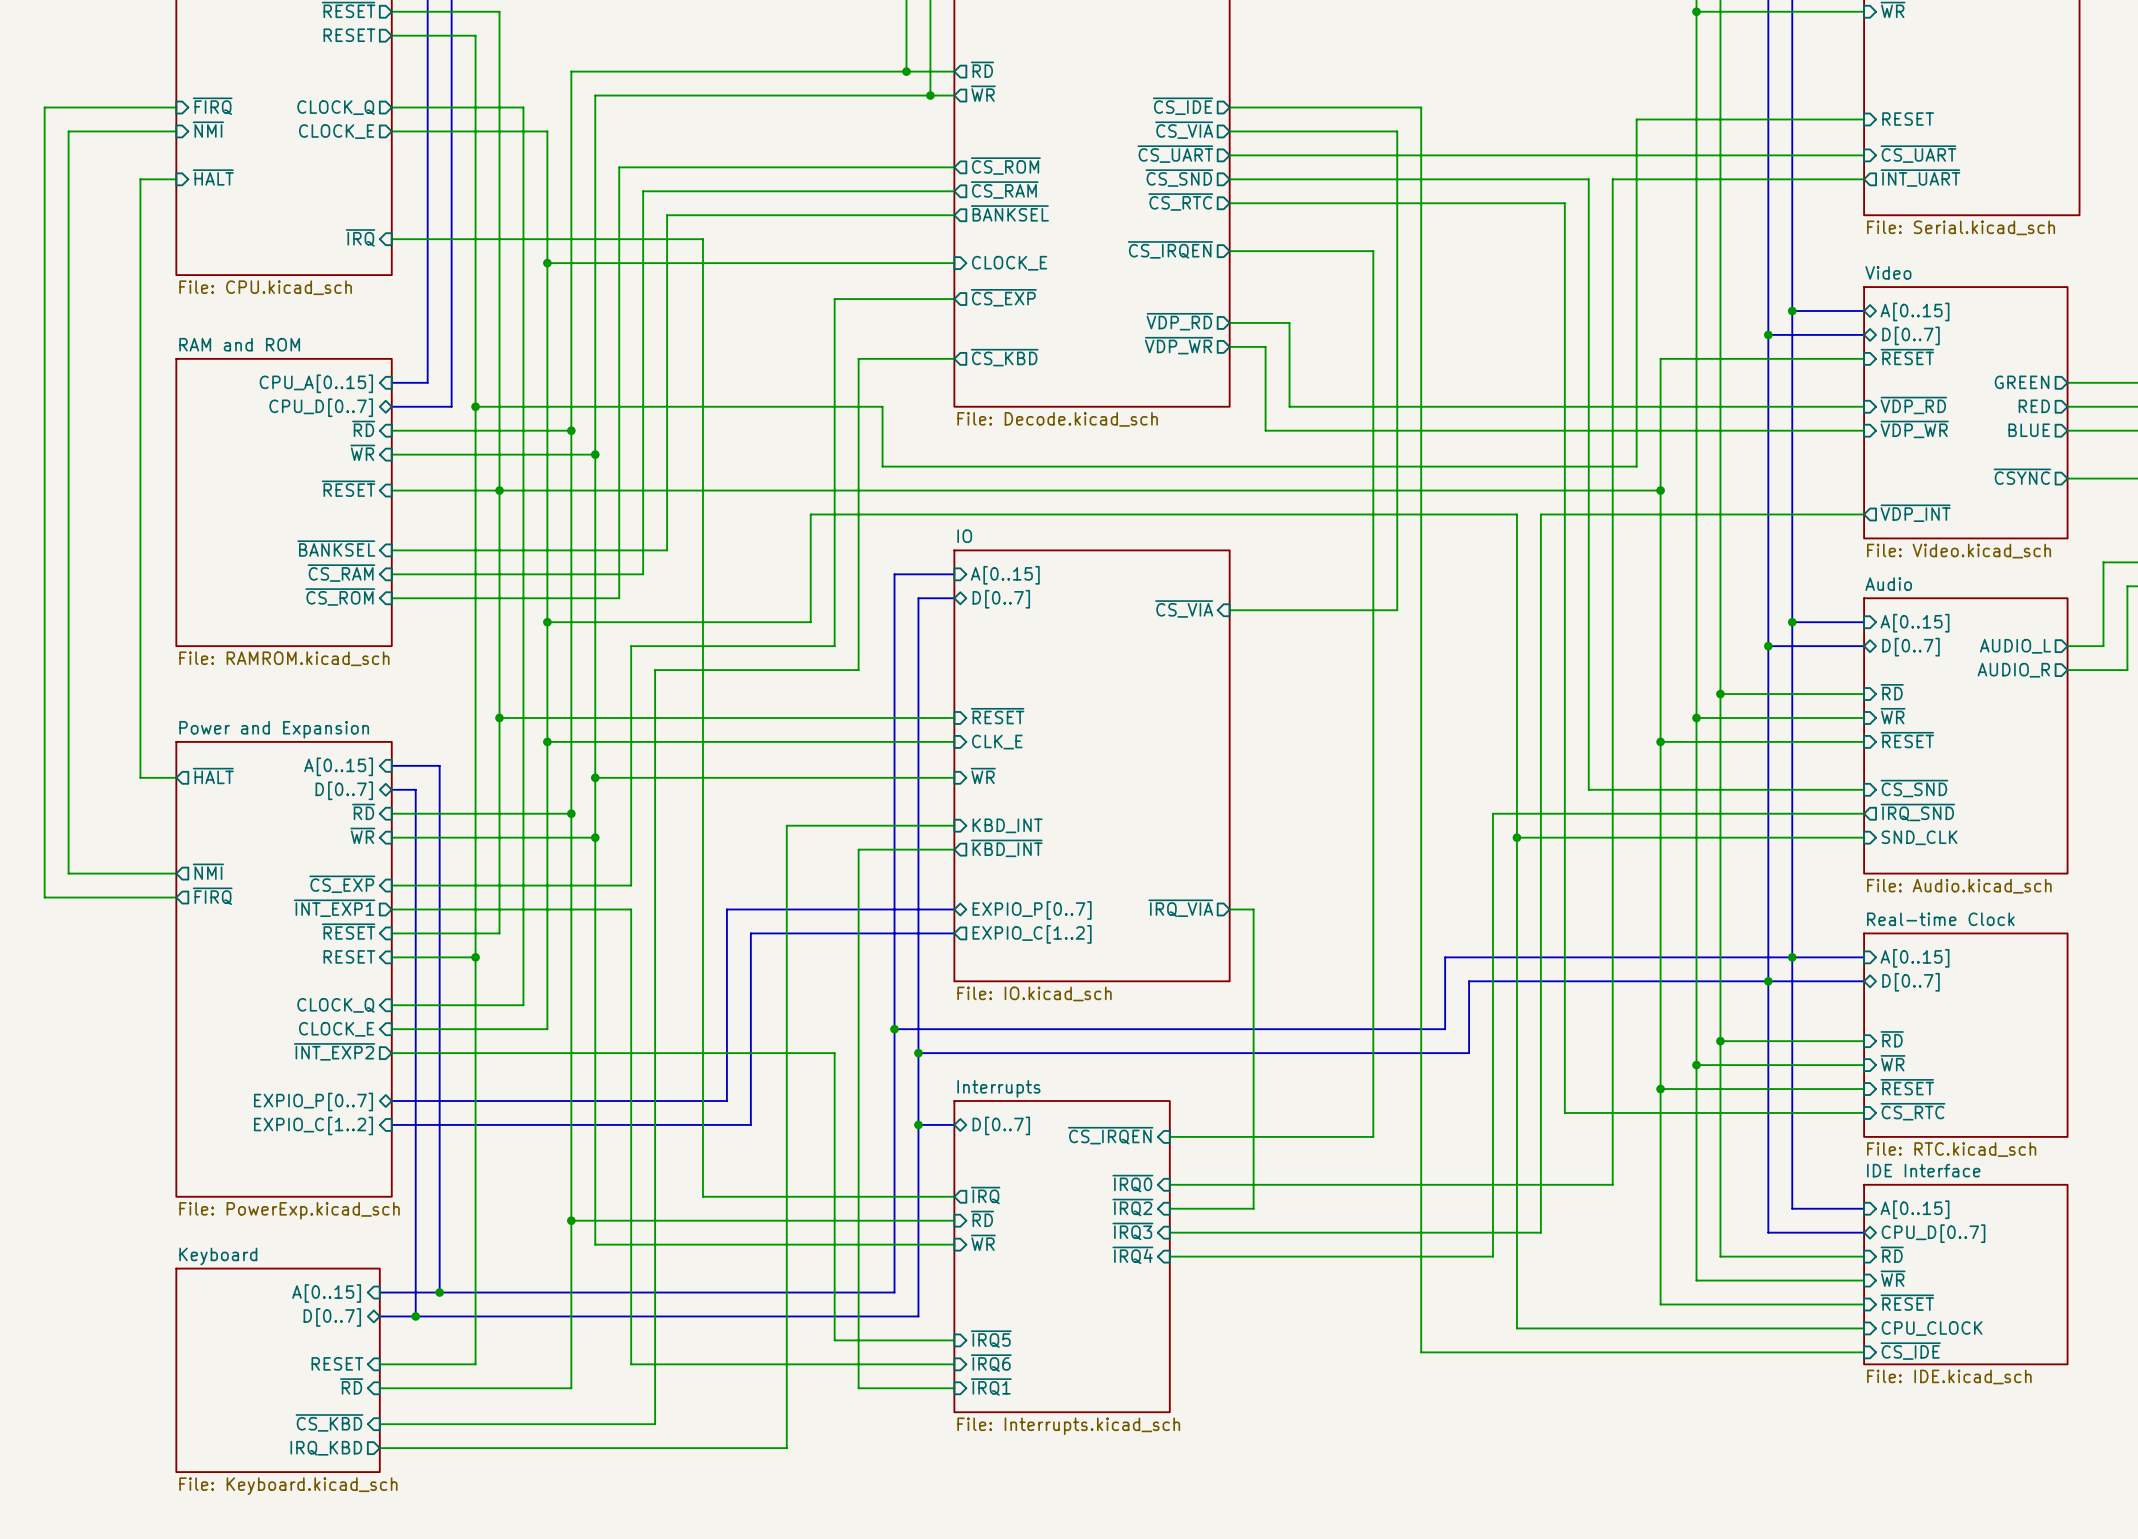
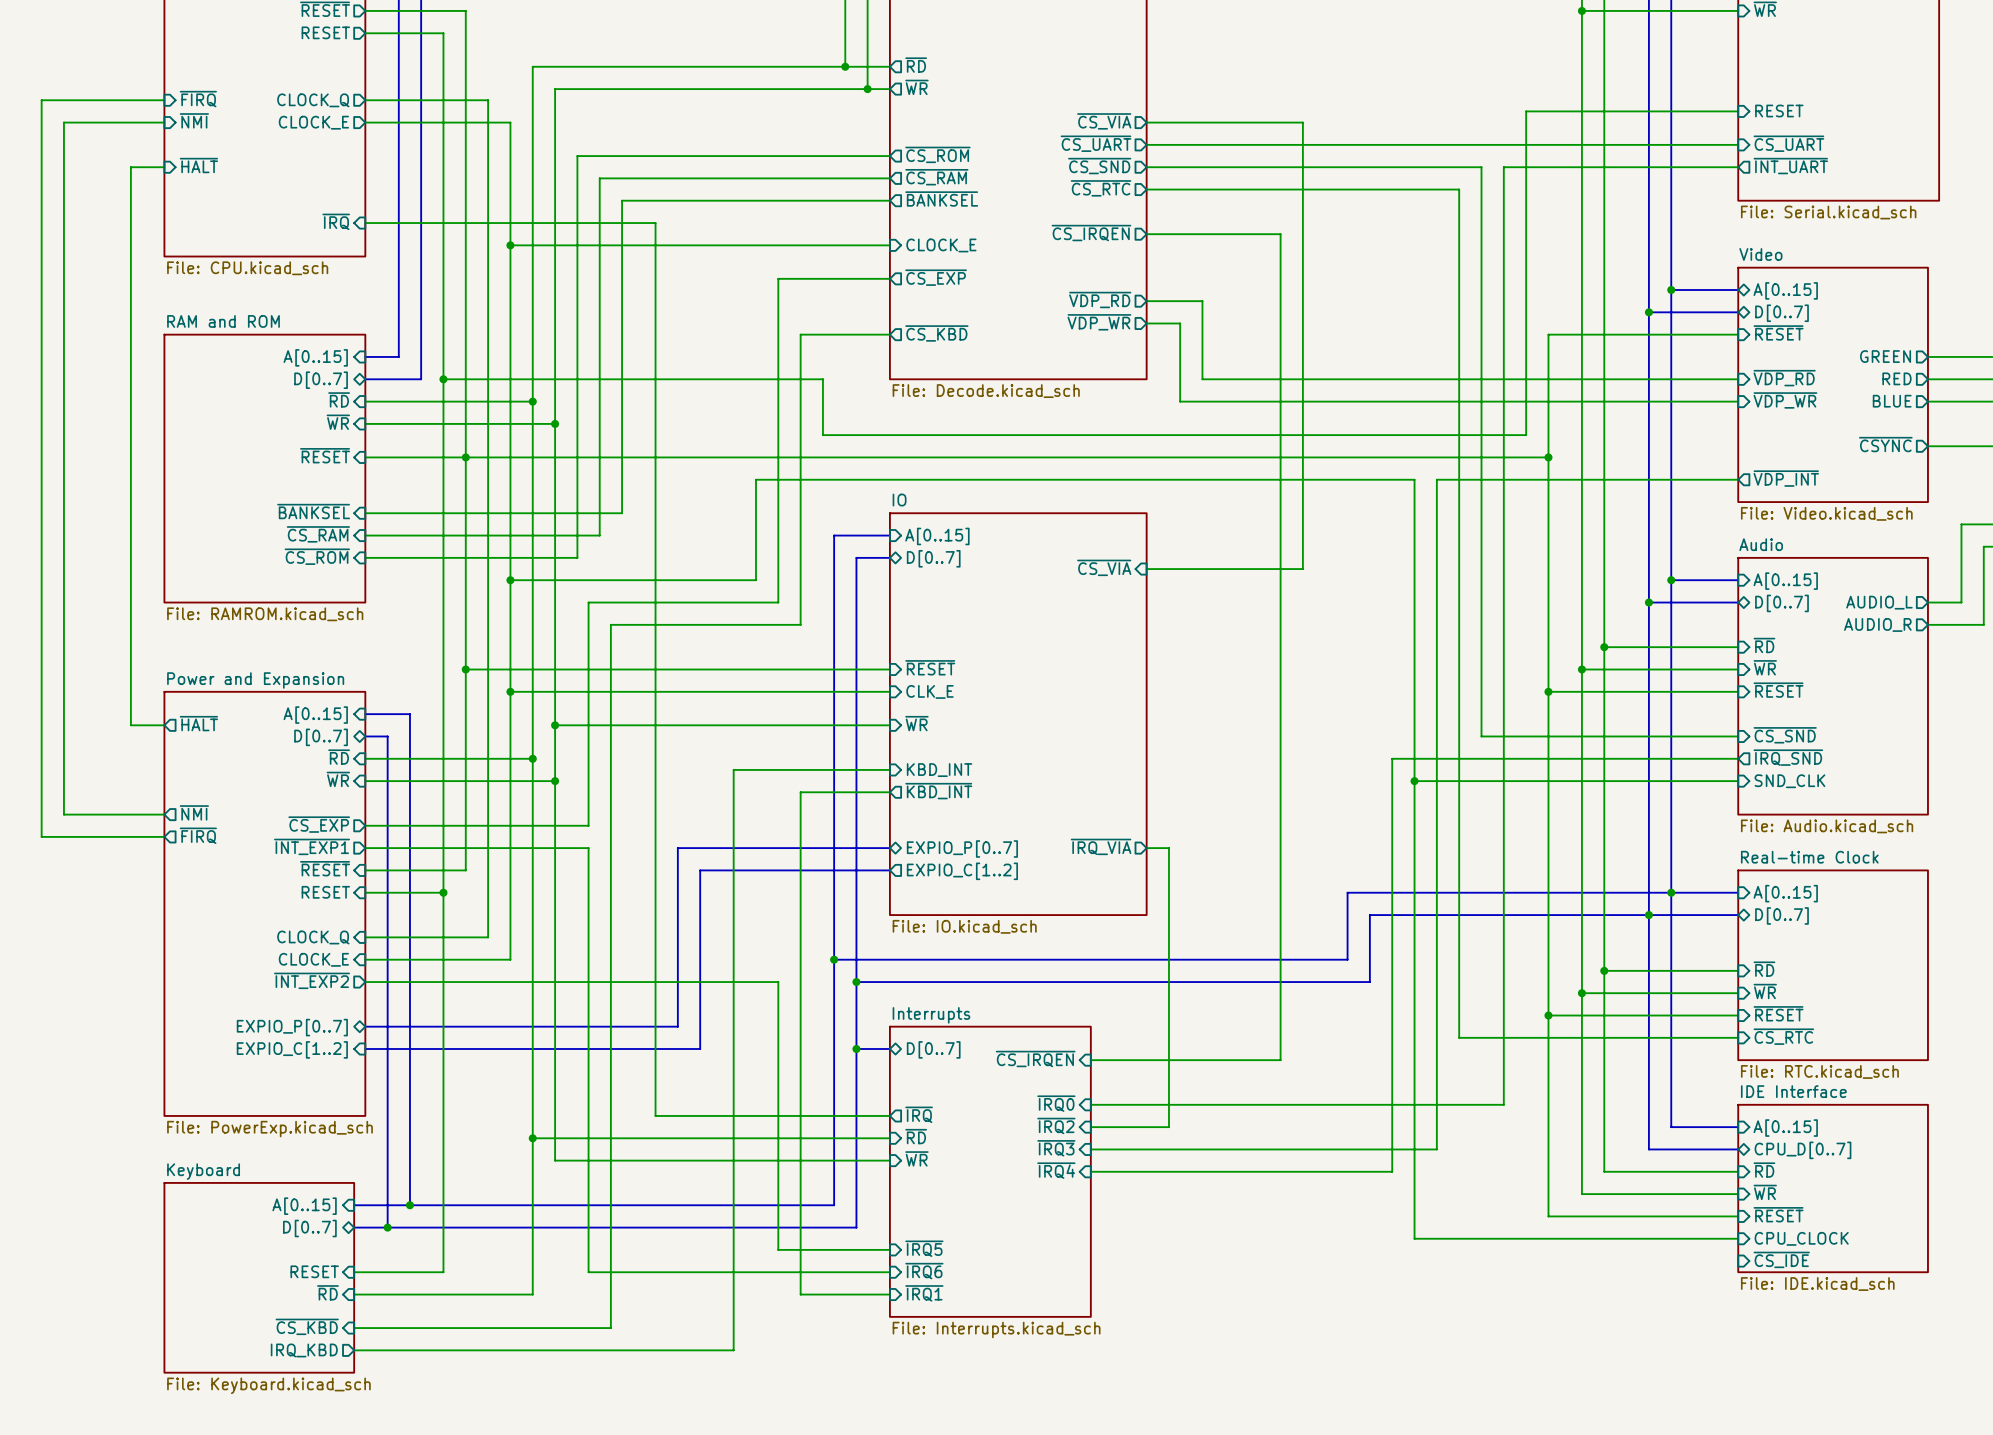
sheet pin: ~{CS_IDE} (1183, 106) -> none
wire: (1229, 107) (1421, 107) (1421, 1352) (1864, 1352) -> none
sheet pin: CPU_A[0..15] (316, 383) -> A[0..15] (315, 357)
sheet pin: CPU_D[0..7] (321, 407) -> D[0..7] (321, 380)
sheet pin shape: input (342, 884) -> output (319, 824)

